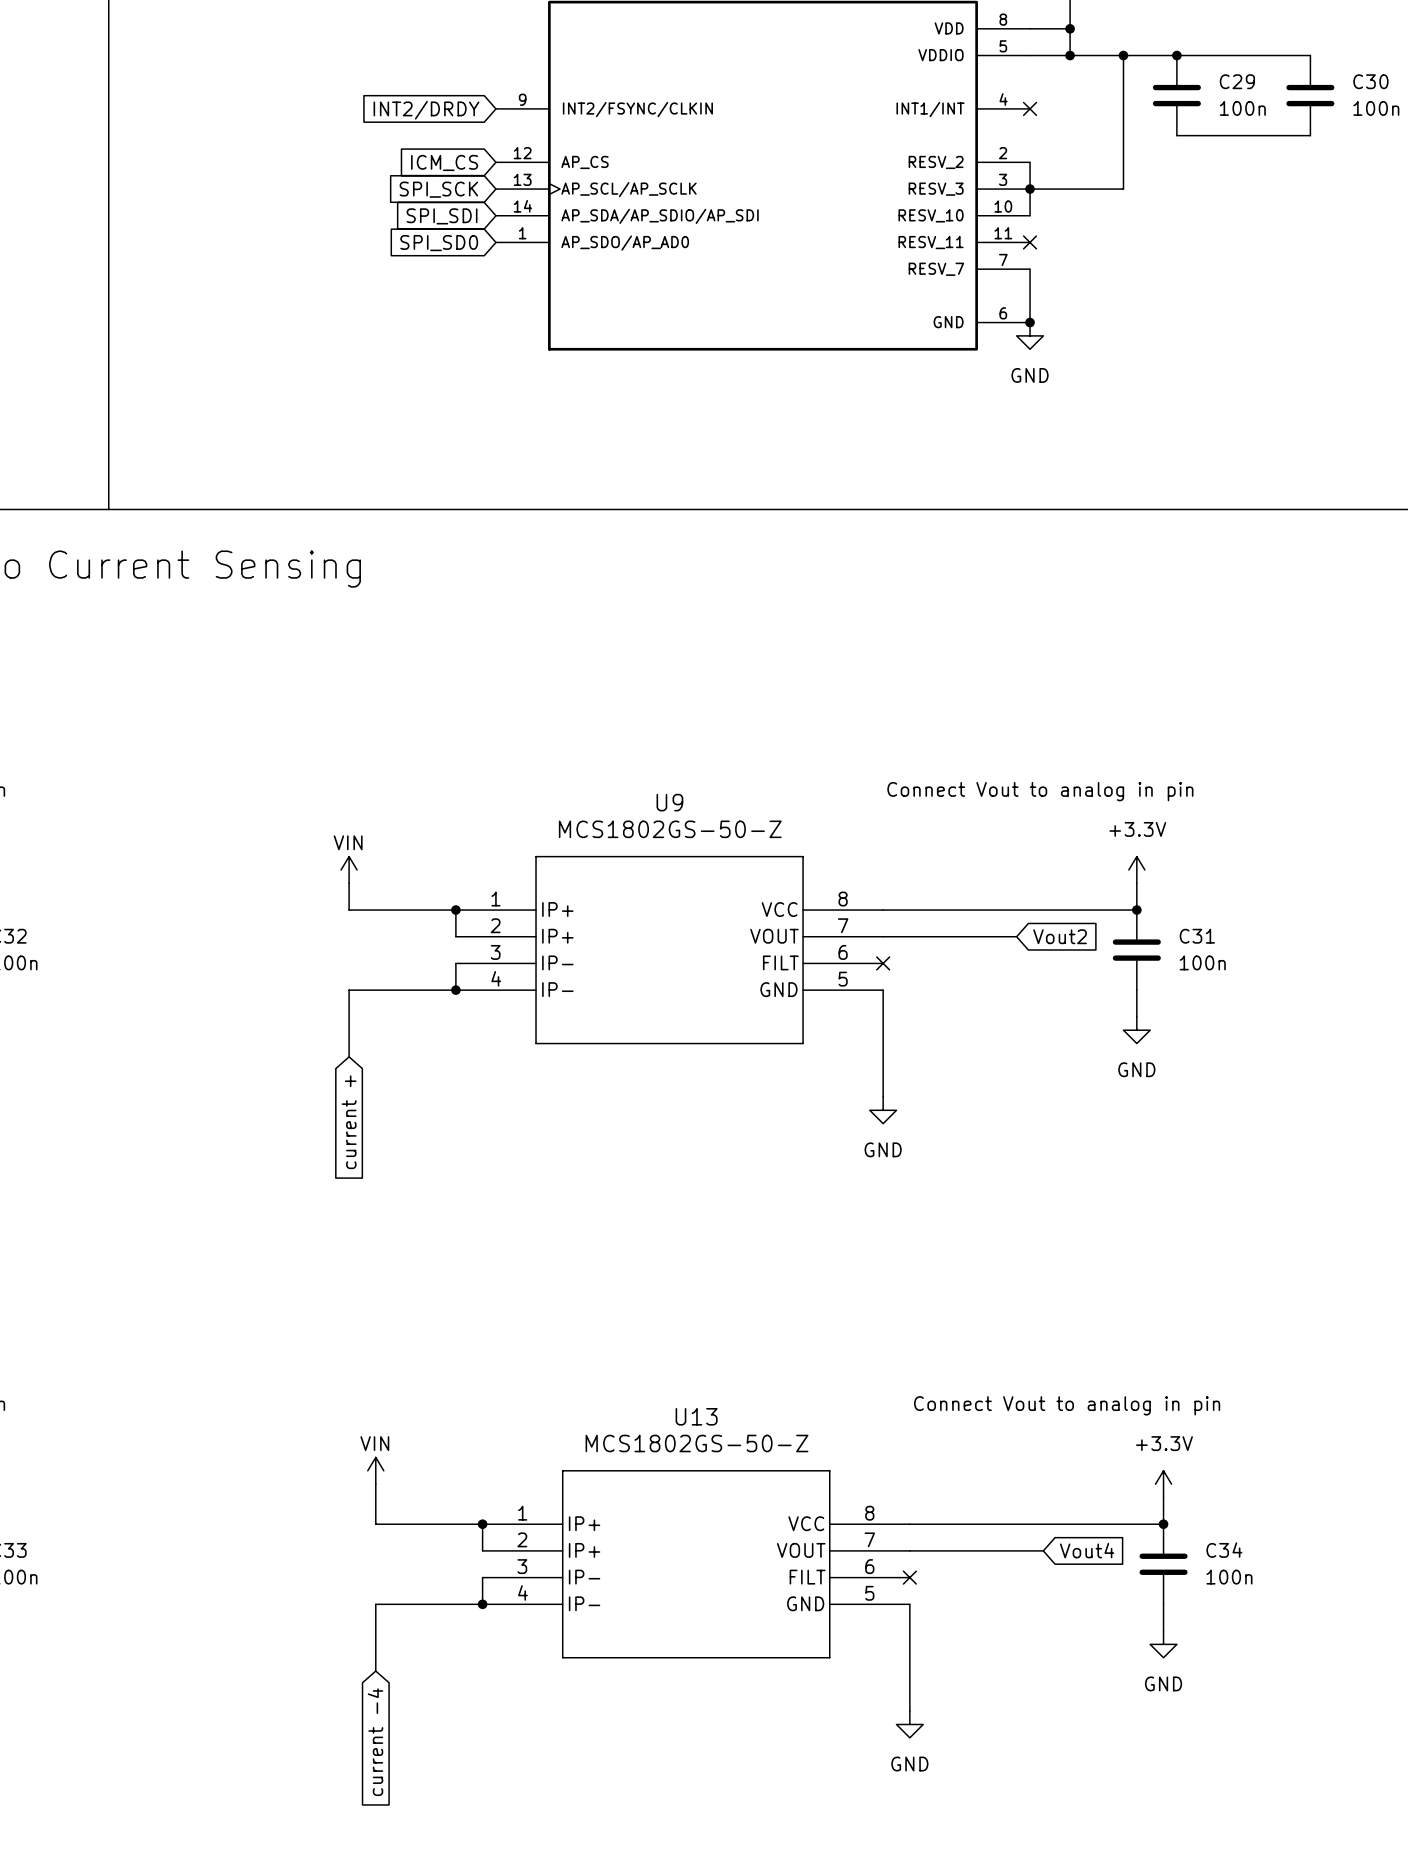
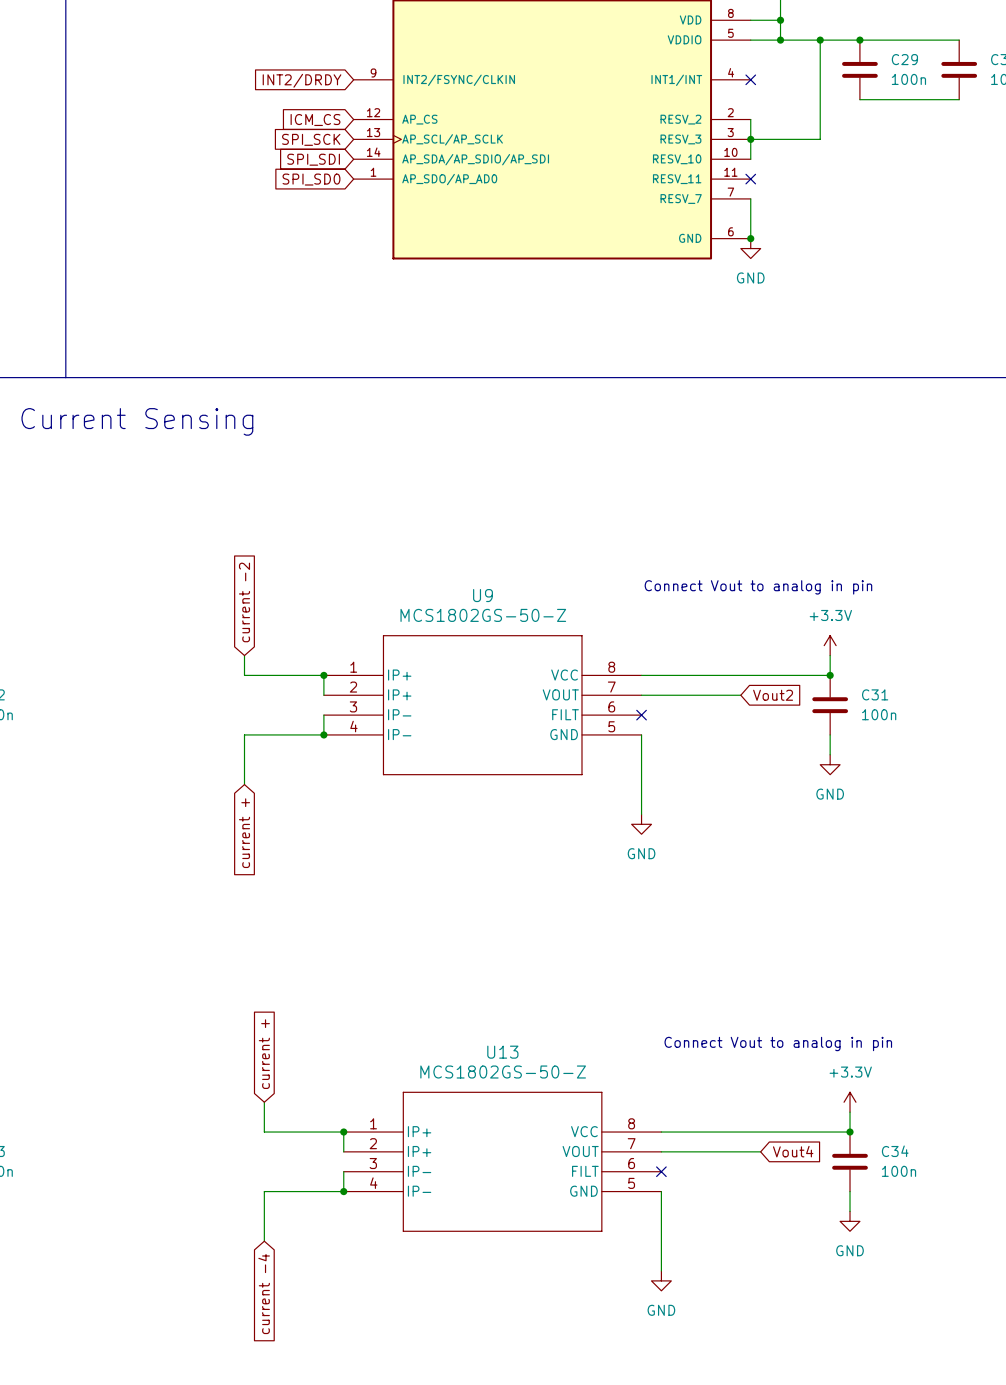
global label: none -> current -2 (244, 602)
power symbol: VIN (349, 869) -> none
global label: none -> current + (264, 1054)
power symbol: VIN (375, 1470) -> none

